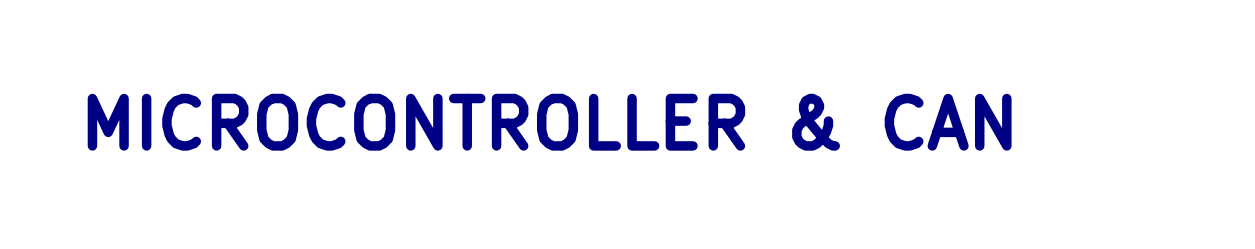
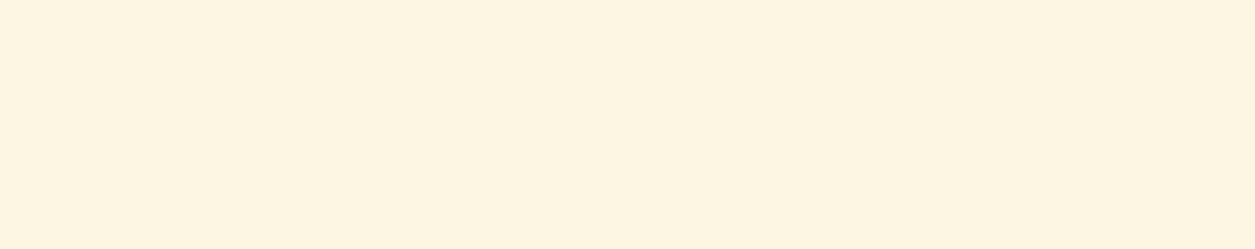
text: MICROCONTROLLER & CAN (549, 122) -> none

